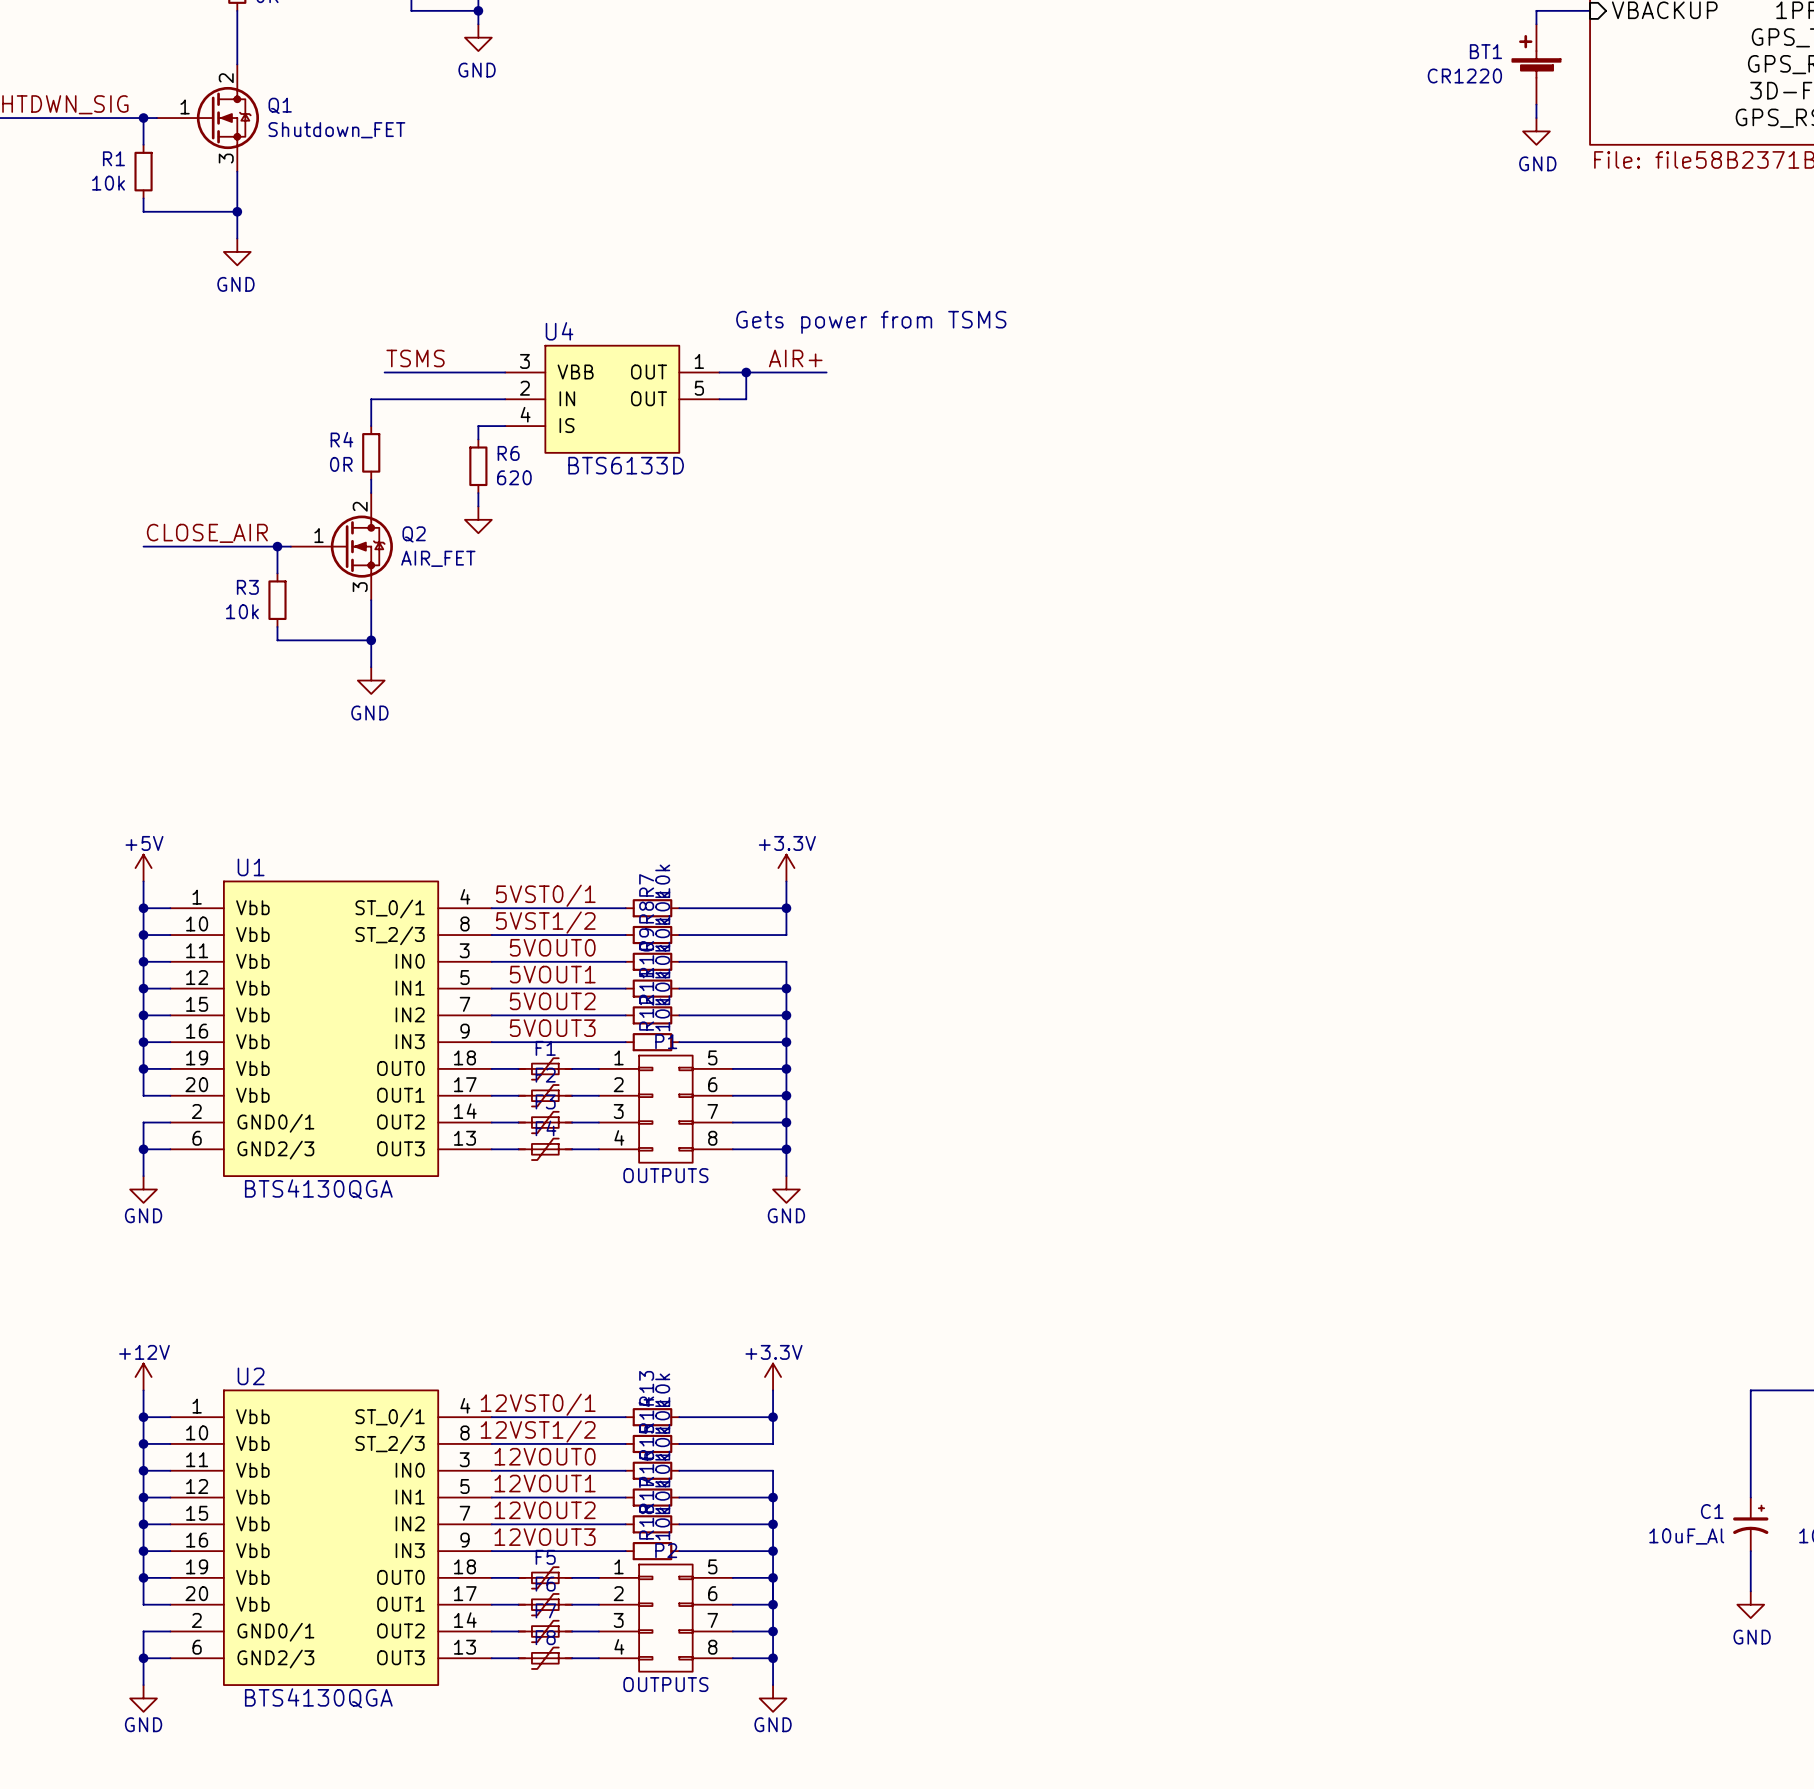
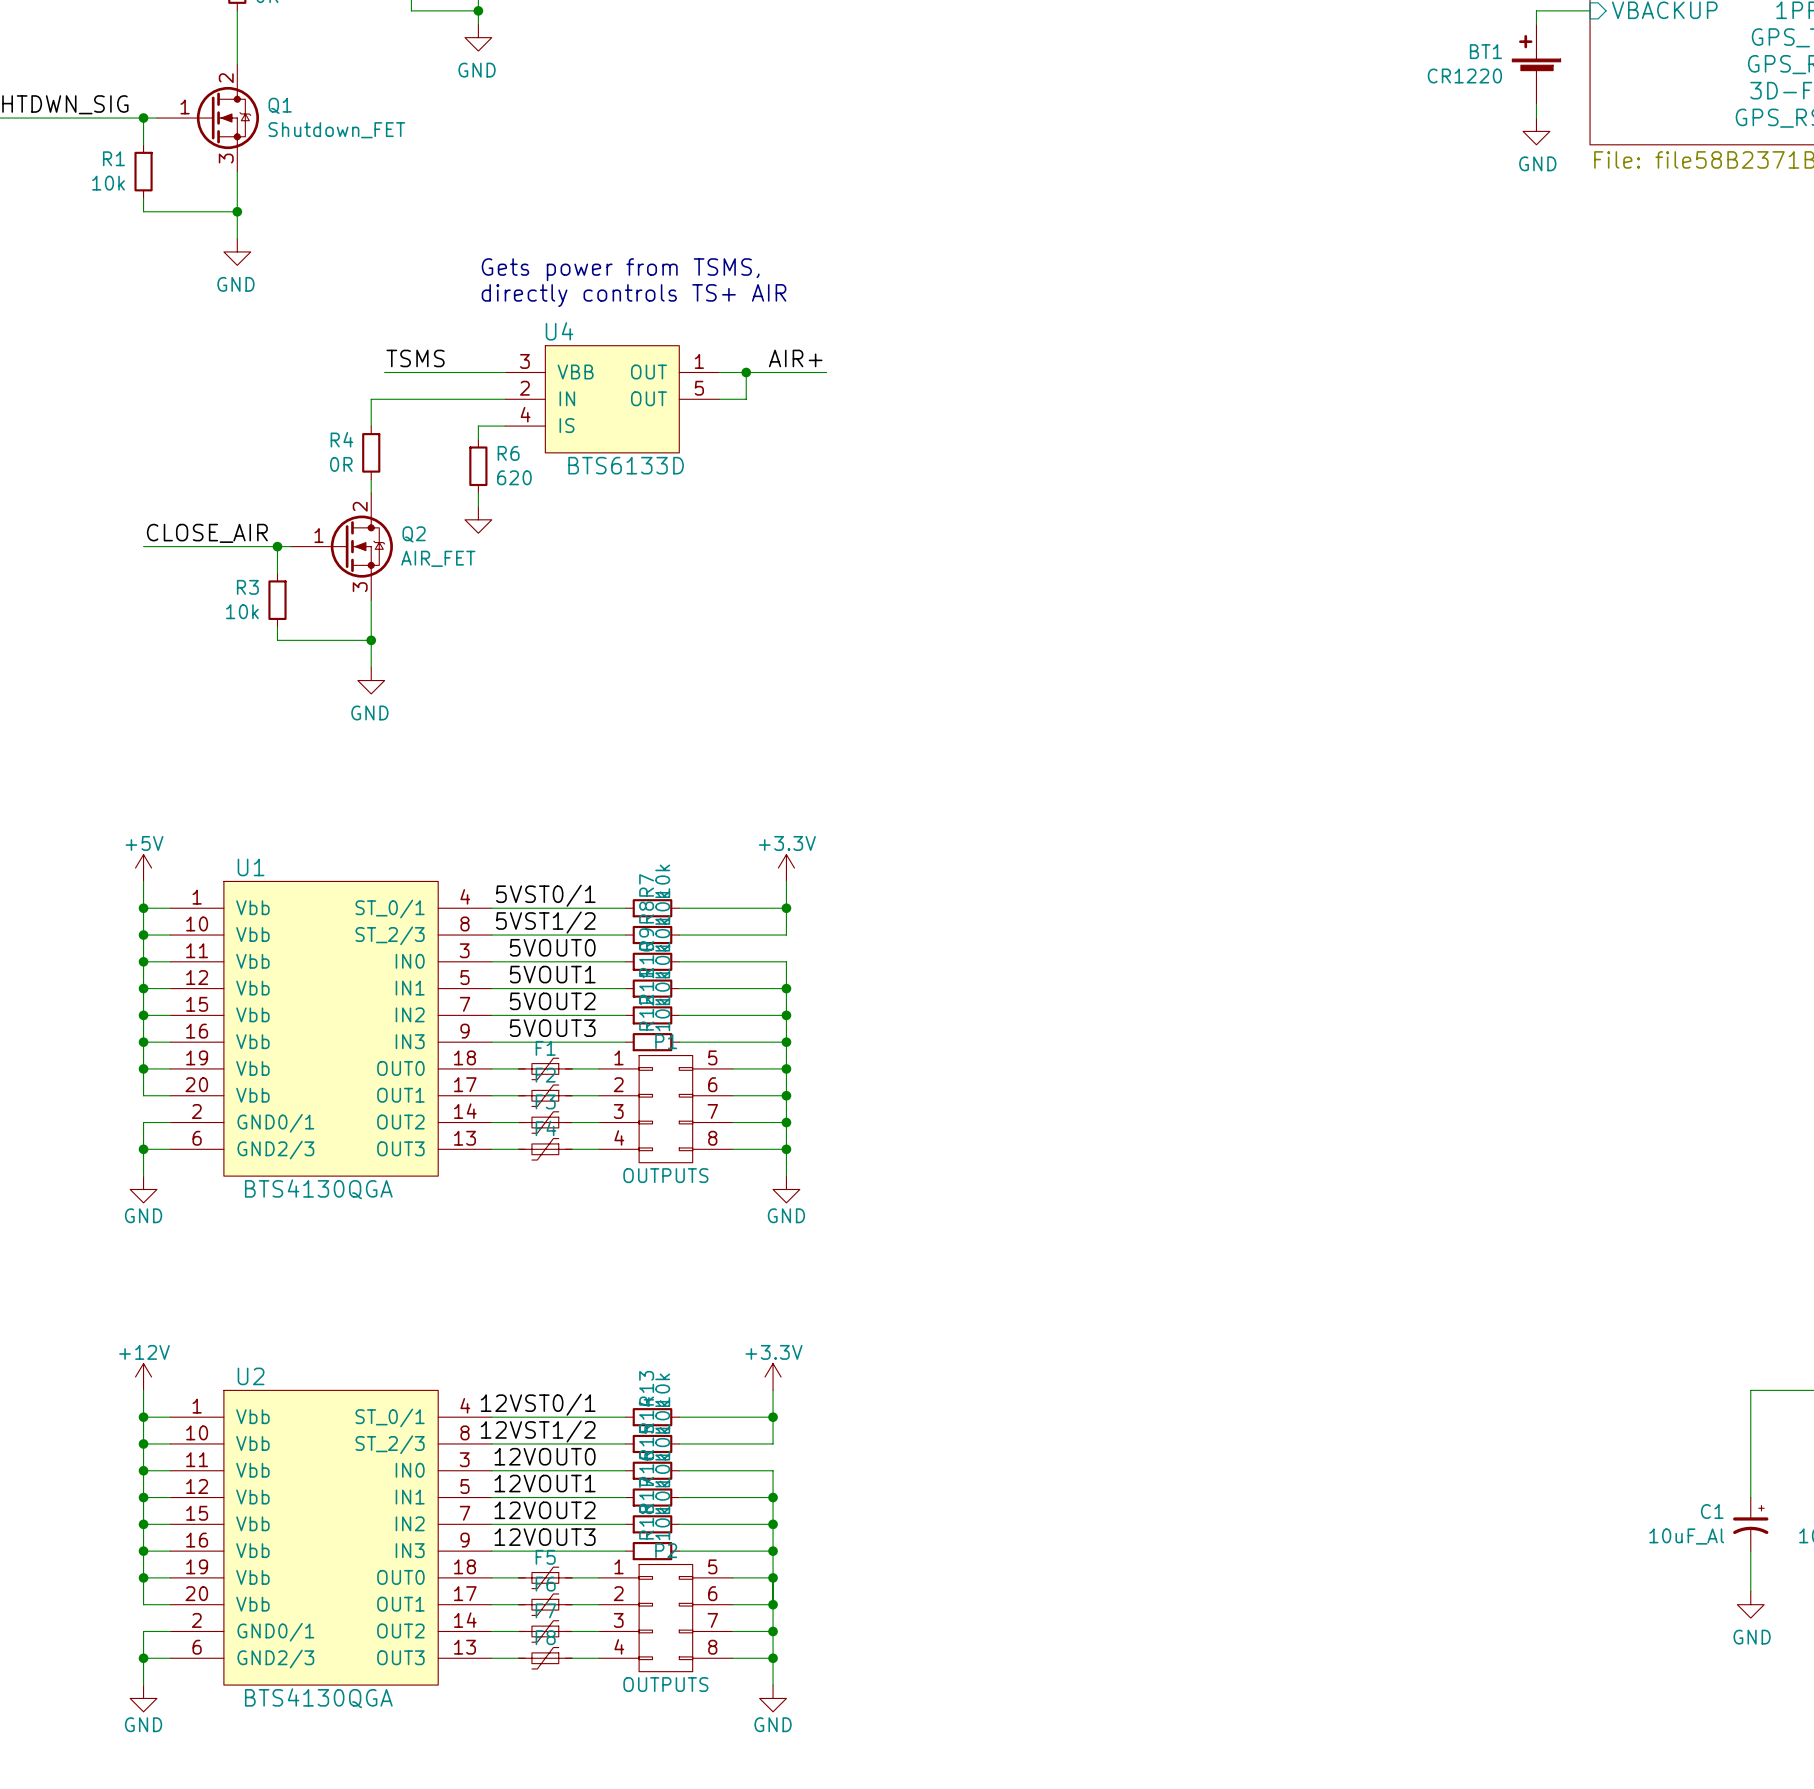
text: none -> Gets power from TSMS, (620, 269)
text: none -> directly controls TS+ AIR (634, 295)
text: Gets power from TSMS (871, 322) -> none

